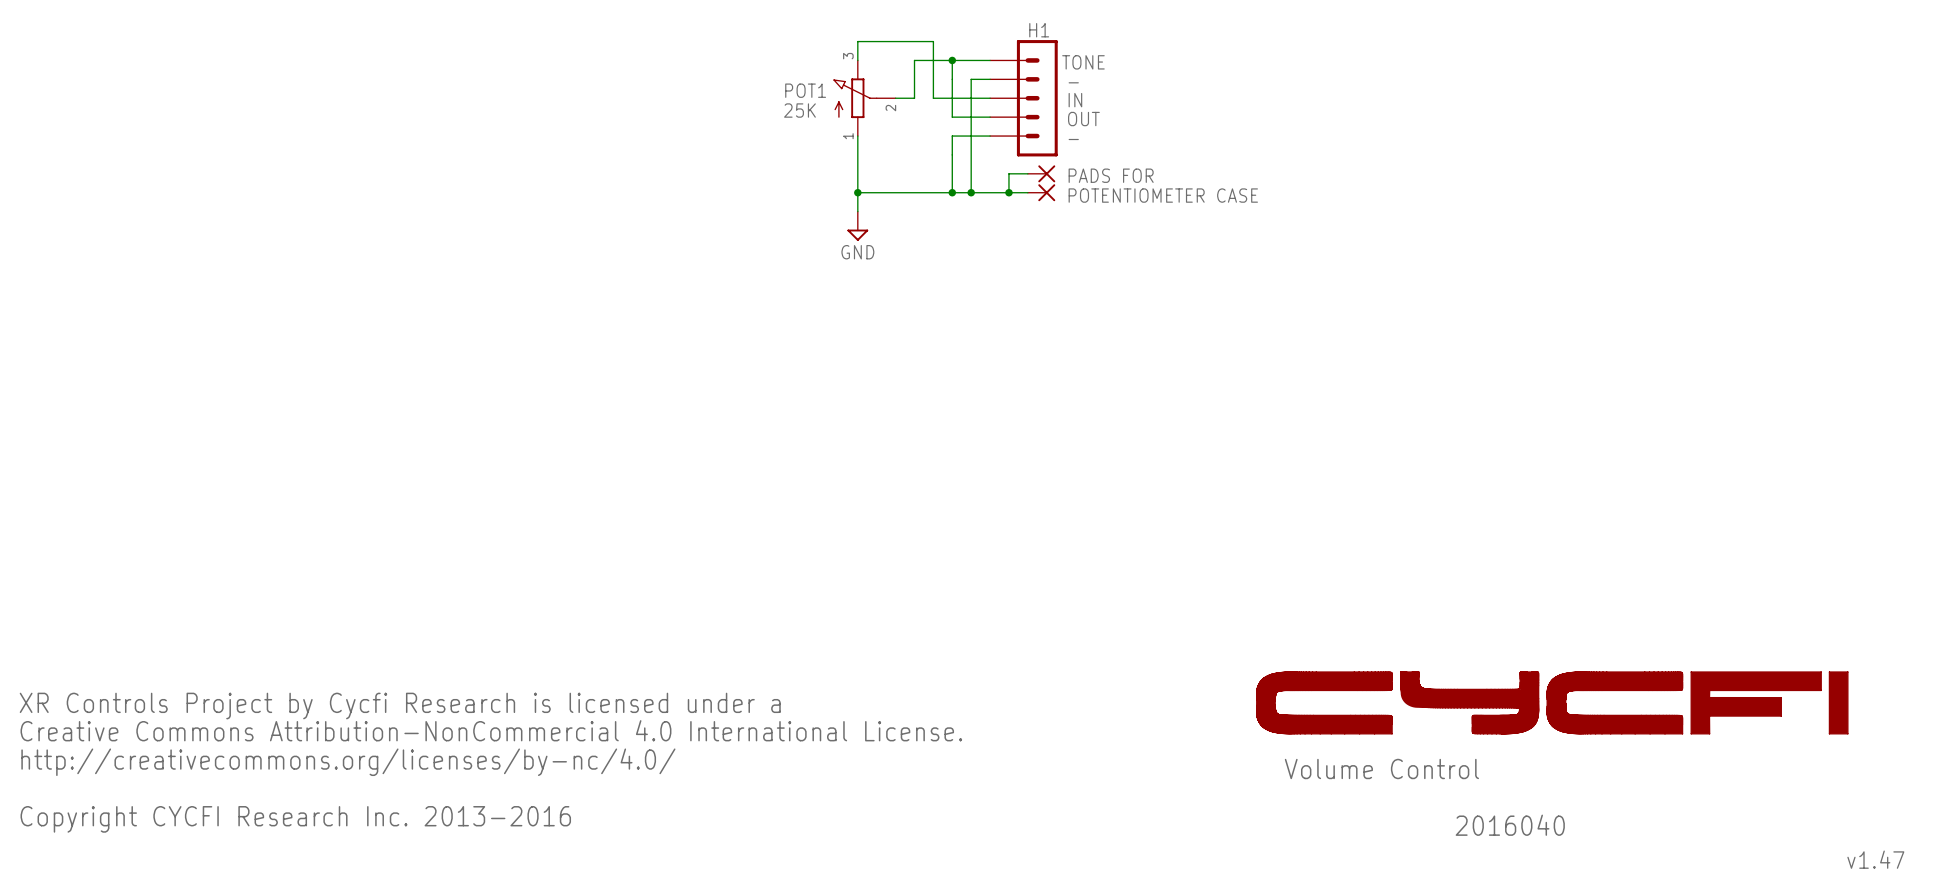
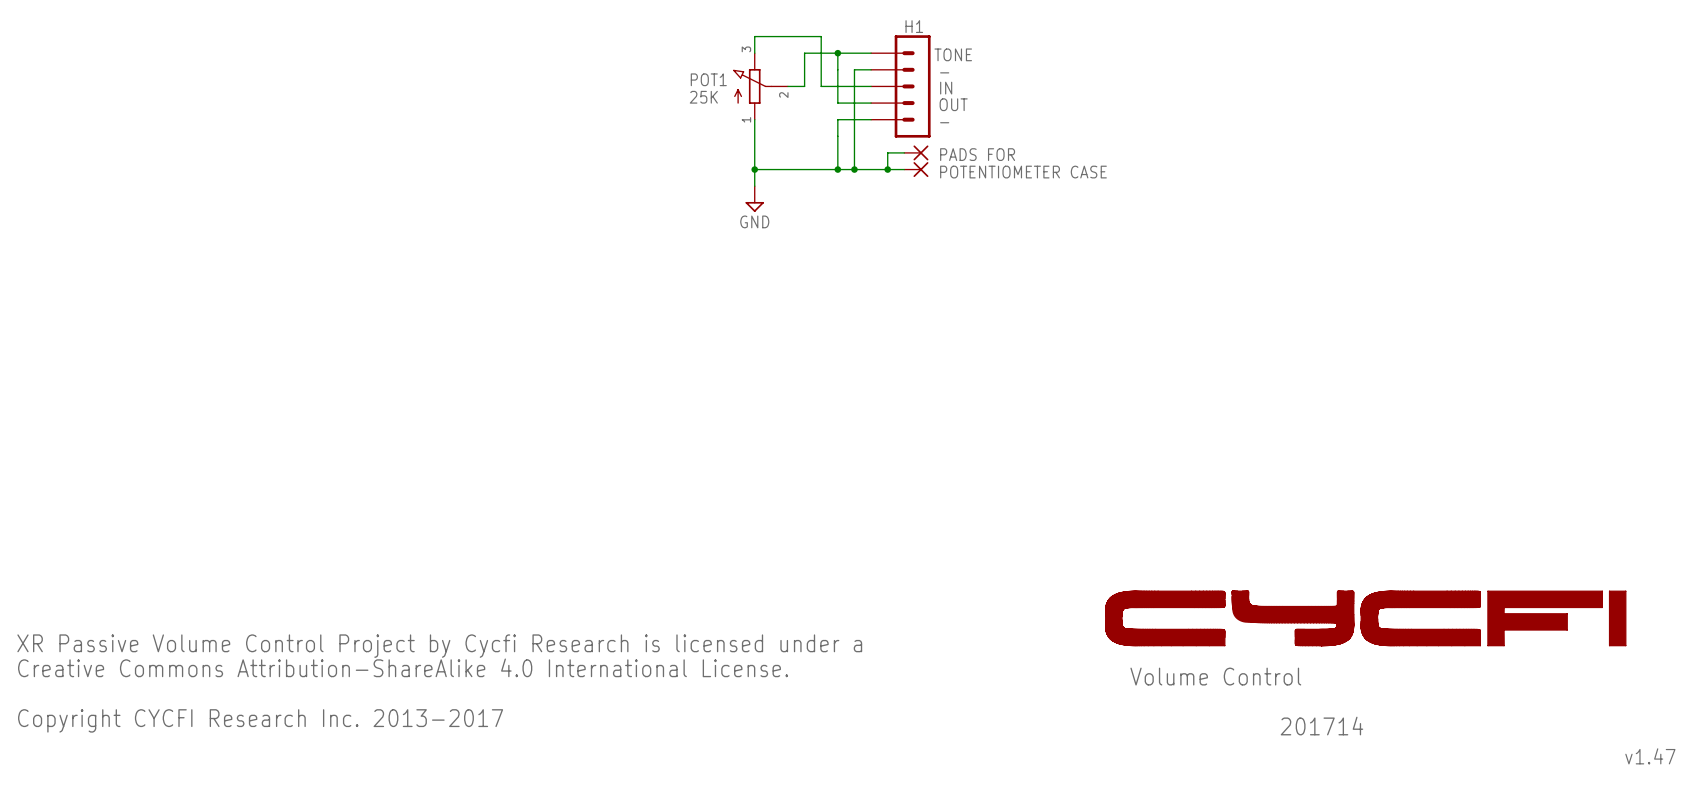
text: XR Controls Project by Cycfi Research is licensed under a (400, 706) -> none
text: Creative Commons Attribution-NonCommercial 4.0 International License. (491, 730) -> XR Passive Volume Control Project by Cycfi Research is licensed under a (439, 646)
text: http://creativecommons.org/licenses/by-nc/4.0/ (348, 762) -> Creative Commons Attribution-ShareAlike 4.0 International License. (403, 667)
text: Copyright CYCFI Research Inc. 2013-2016 (295, 819) -> Copyright CYCFI Research Inc. 2013-2017 (260, 720)
text: 2016040 (1510, 825) -> 201714 (1321, 726)

